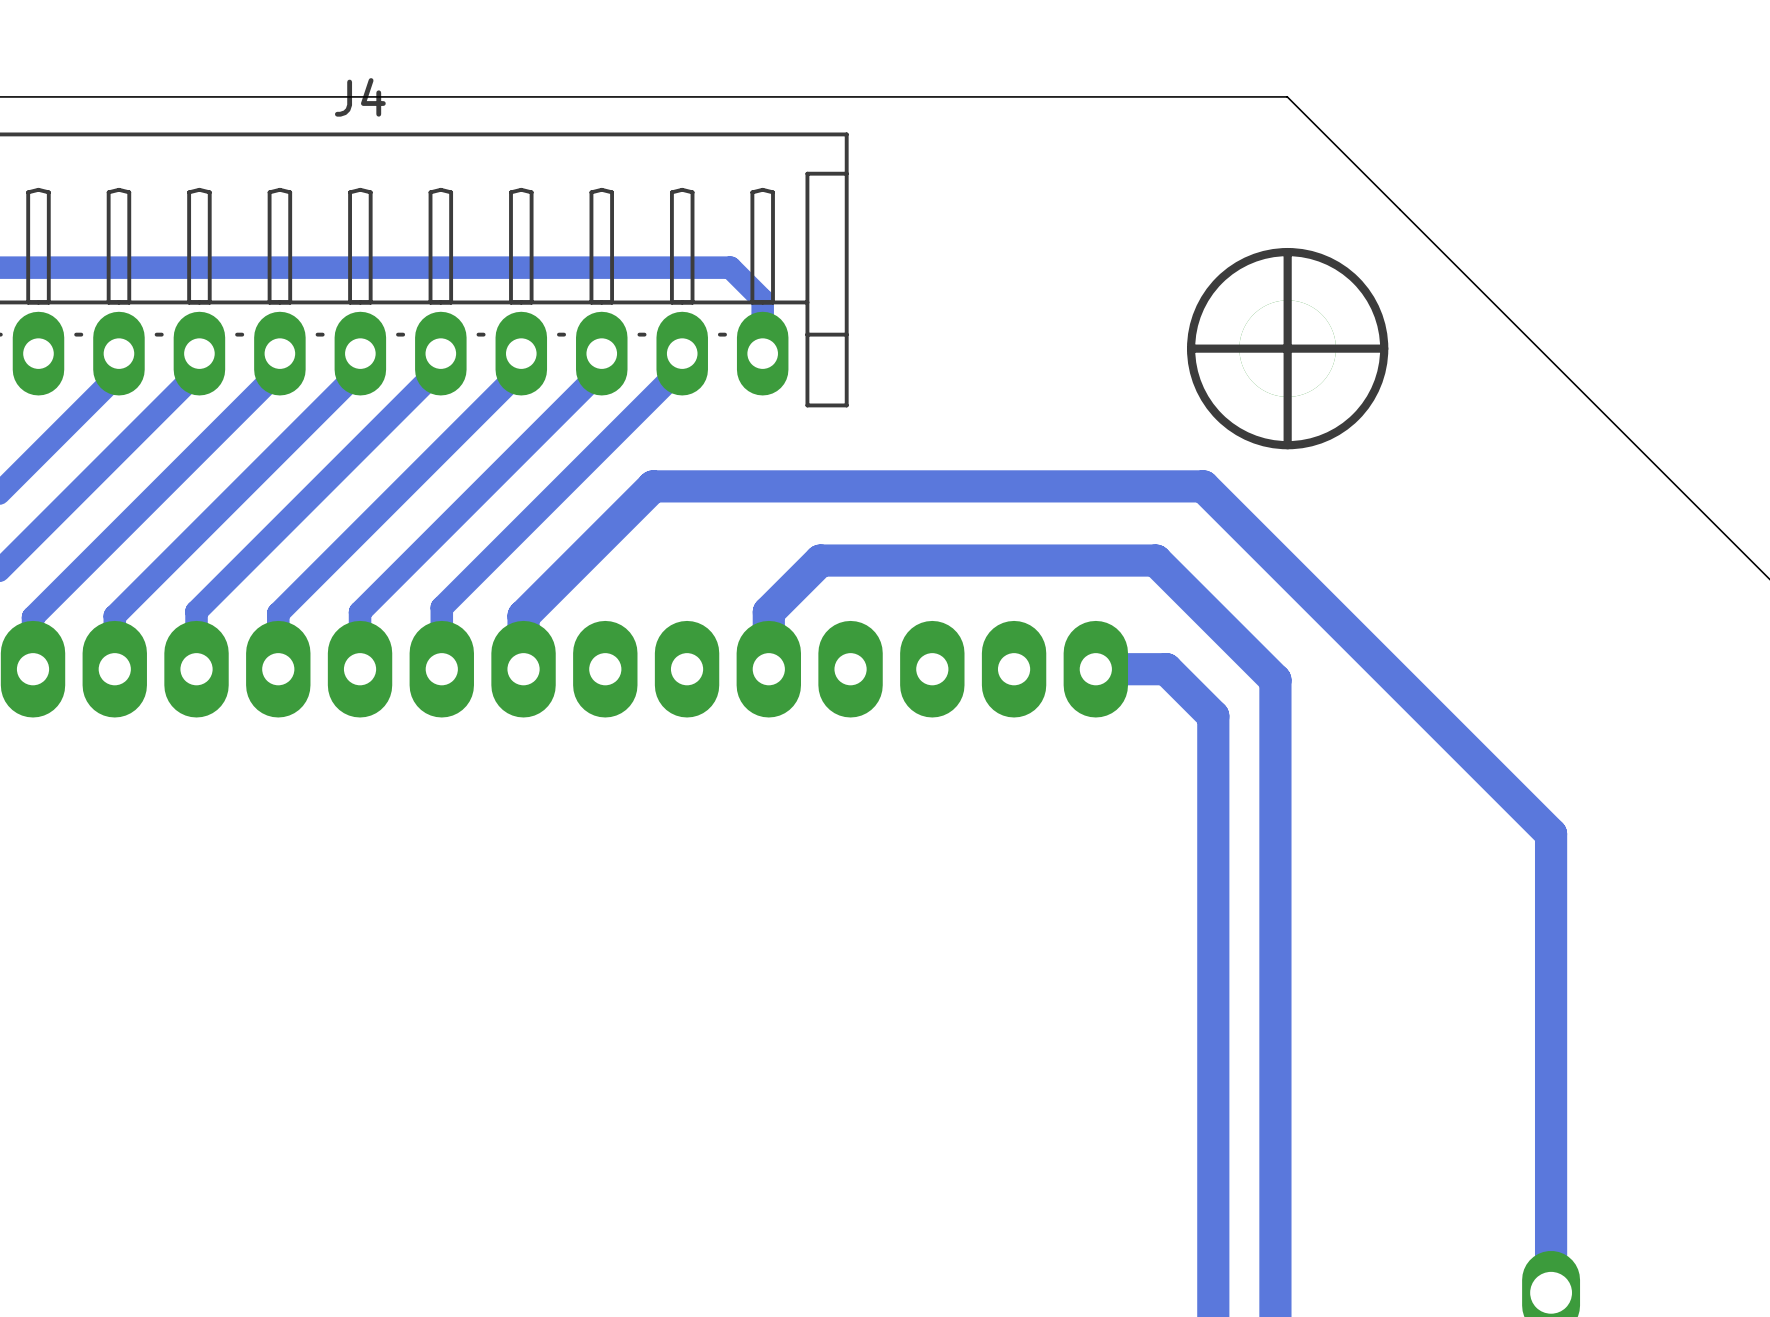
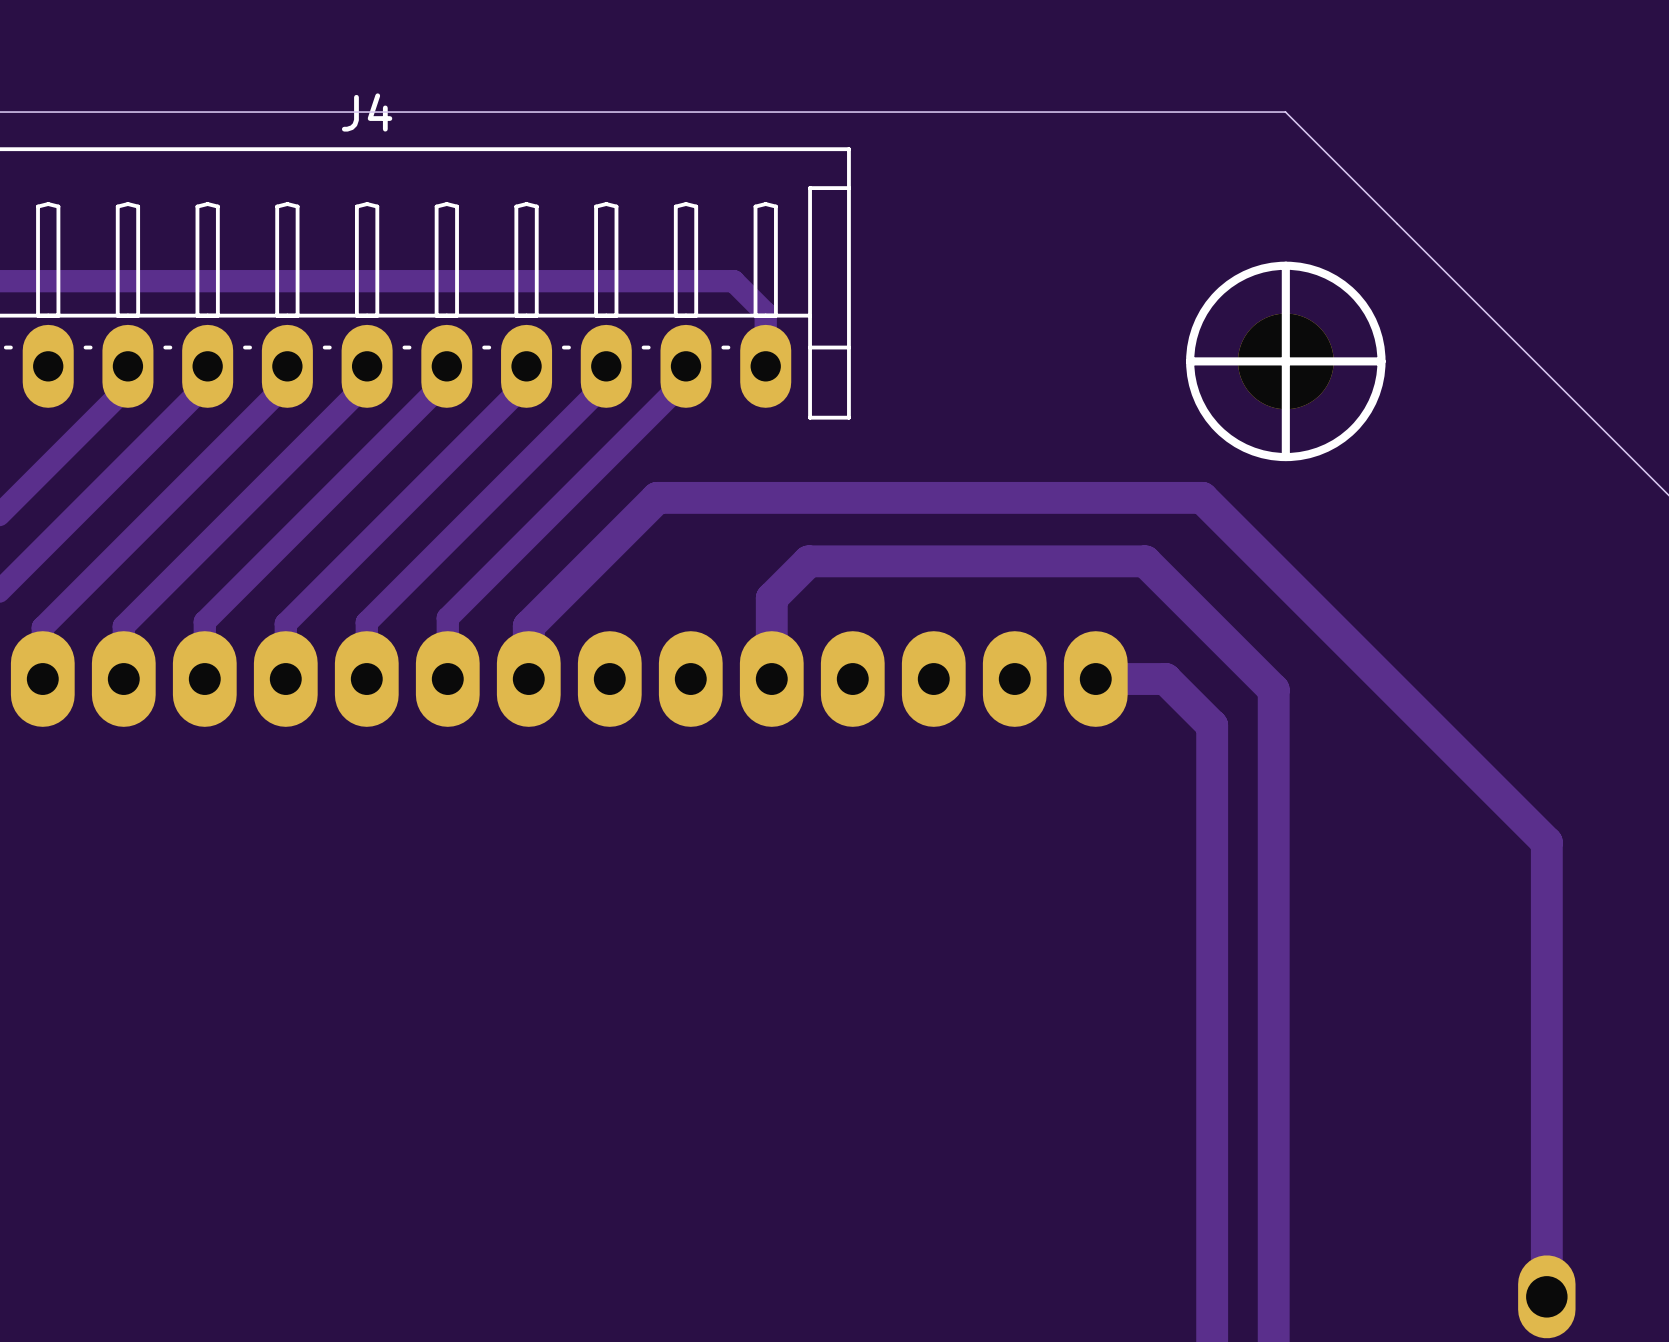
track: (1155, 560) (820, 560) (768, 612) -> (1155, 571) (1145, 561) (808, 561) (771, 598) (771, 622)

